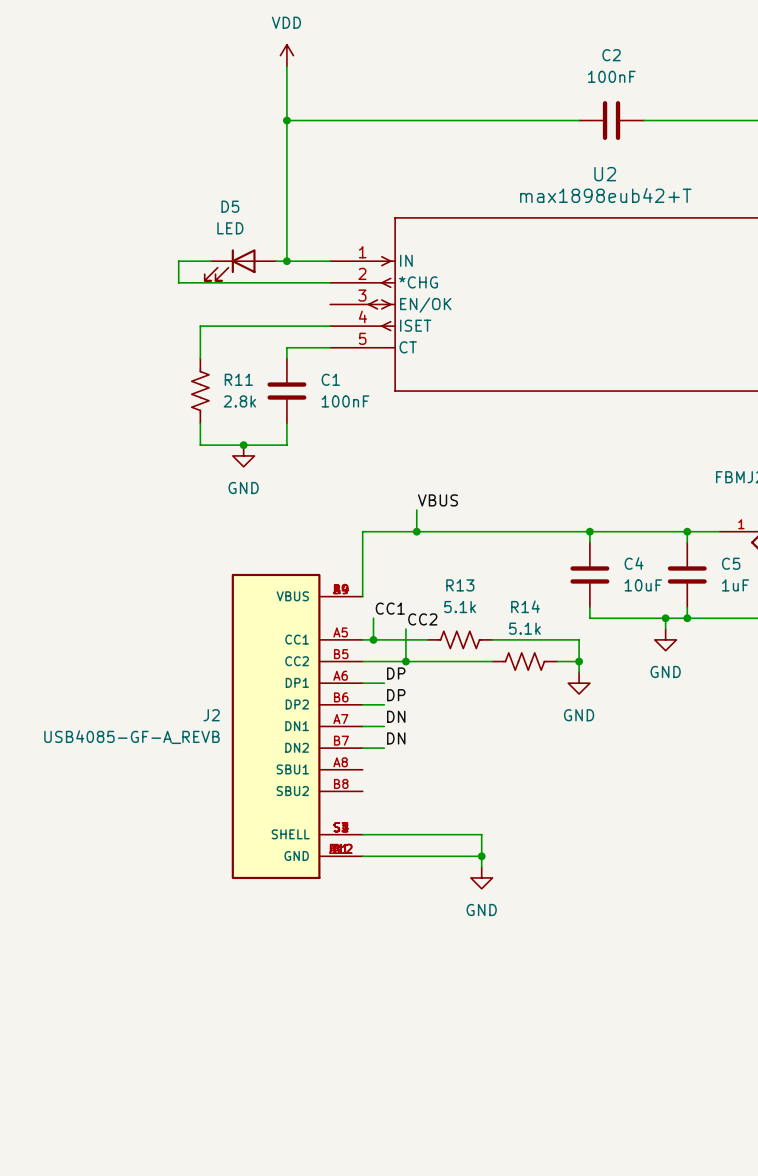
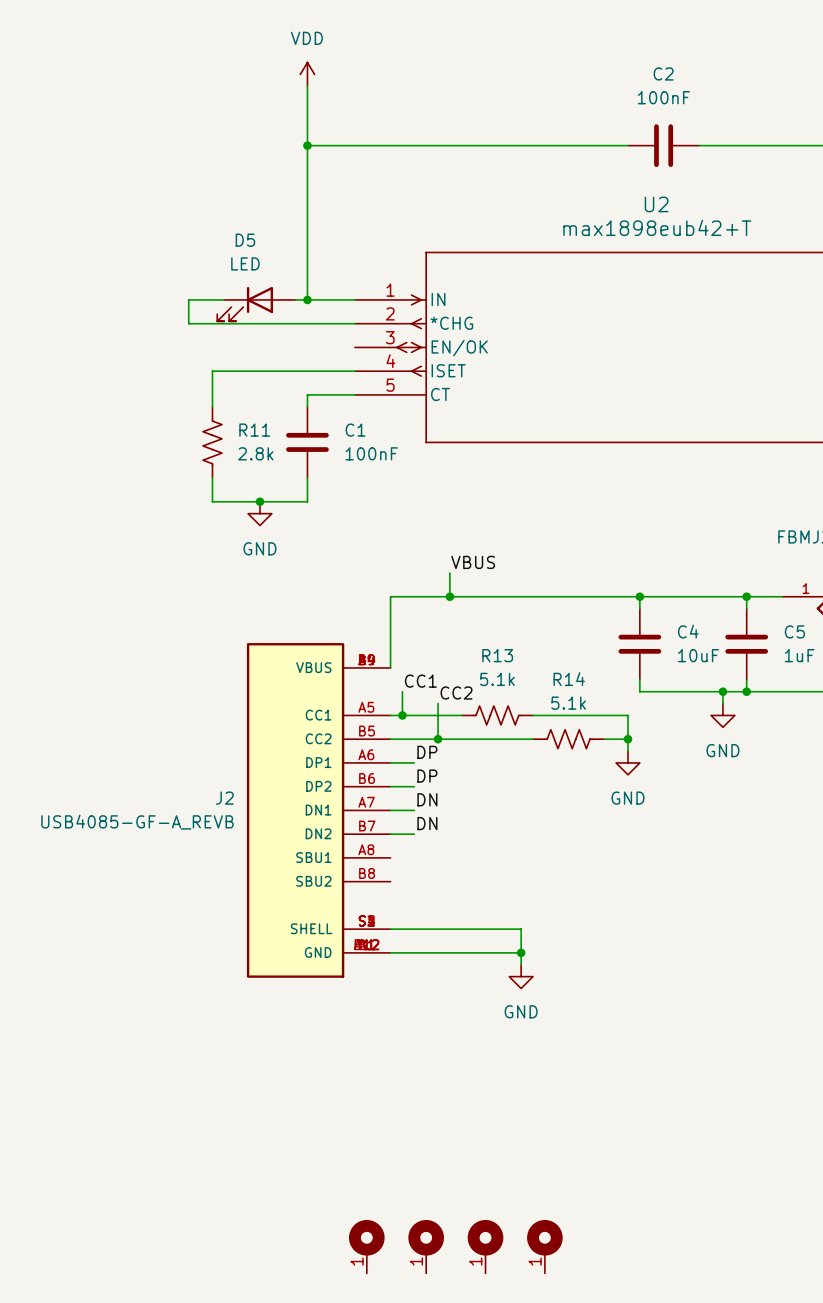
part: none -> (366, 1246)
part: none -> (426, 1246)
part: none -> (485, 1246)
part: none -> (544, 1246)

